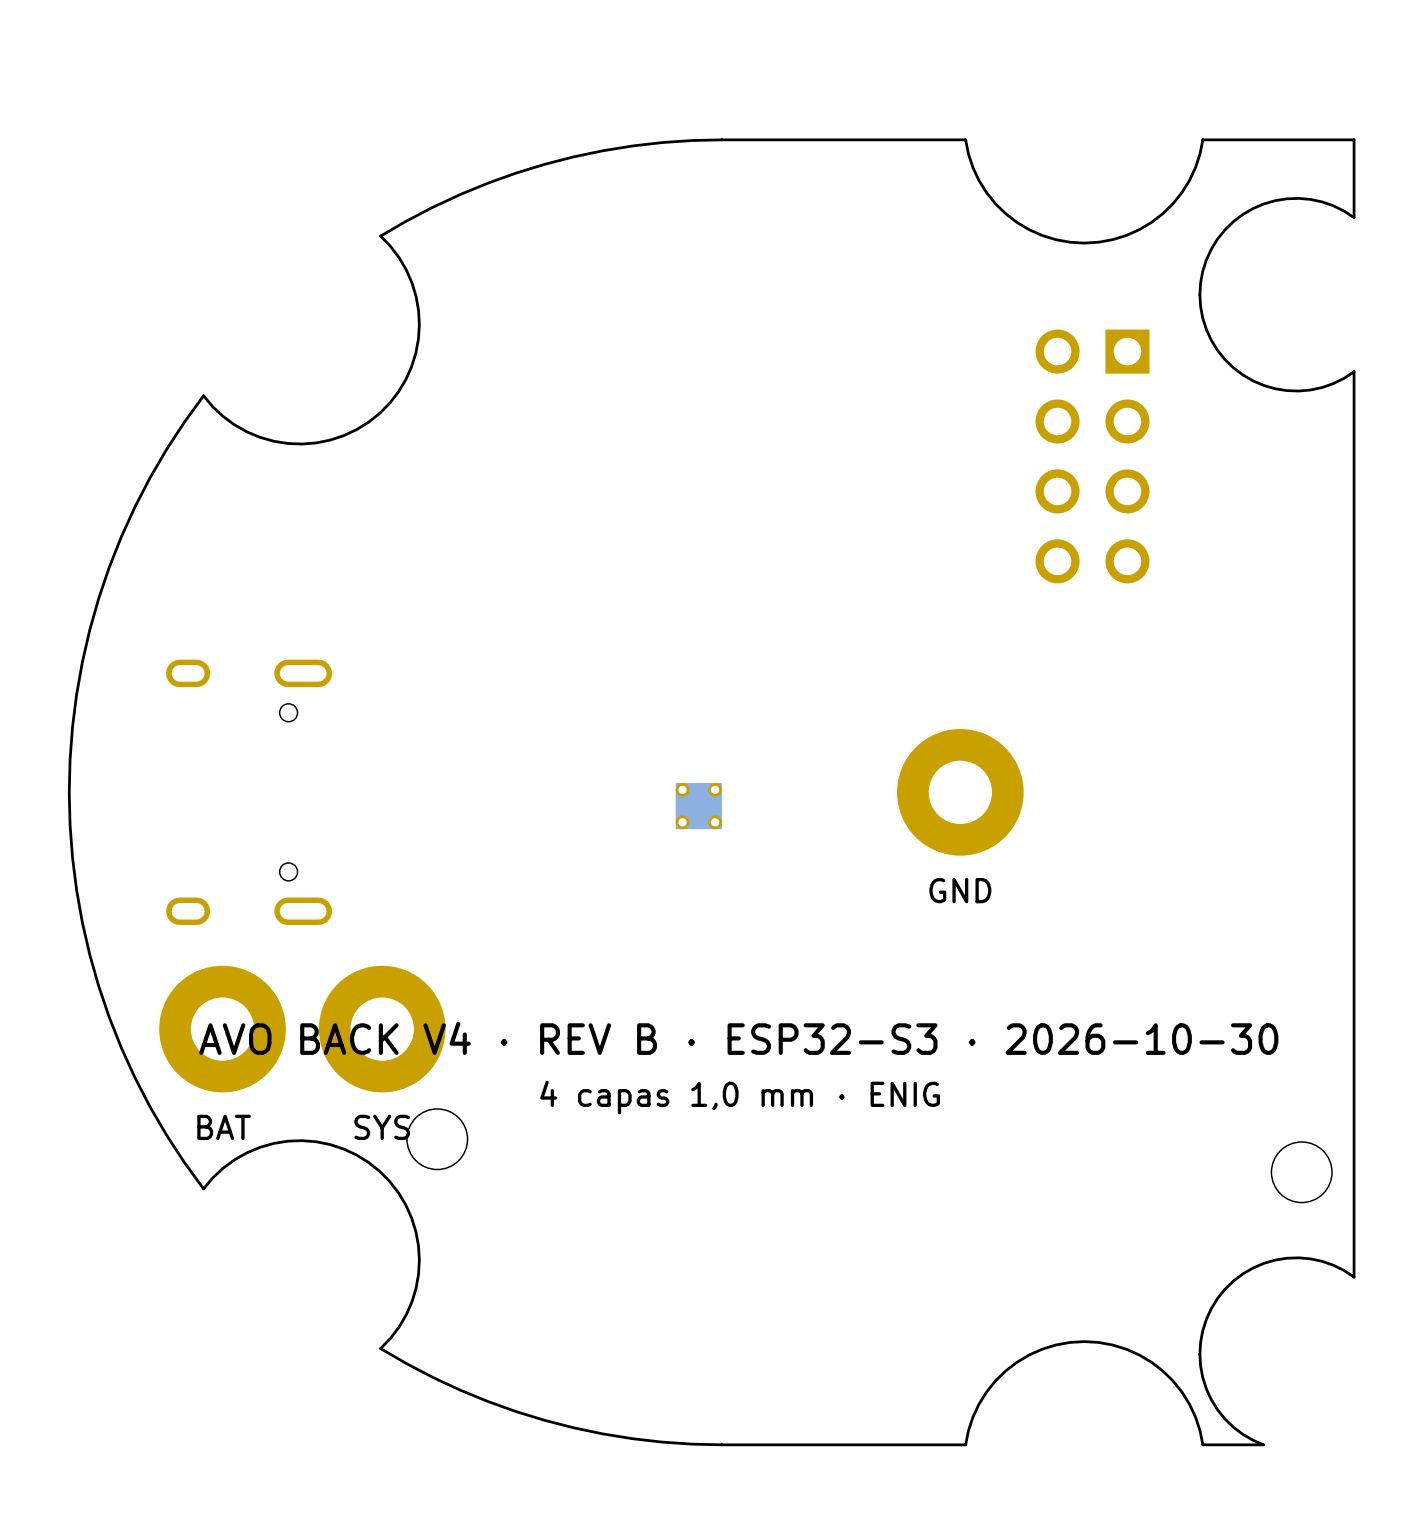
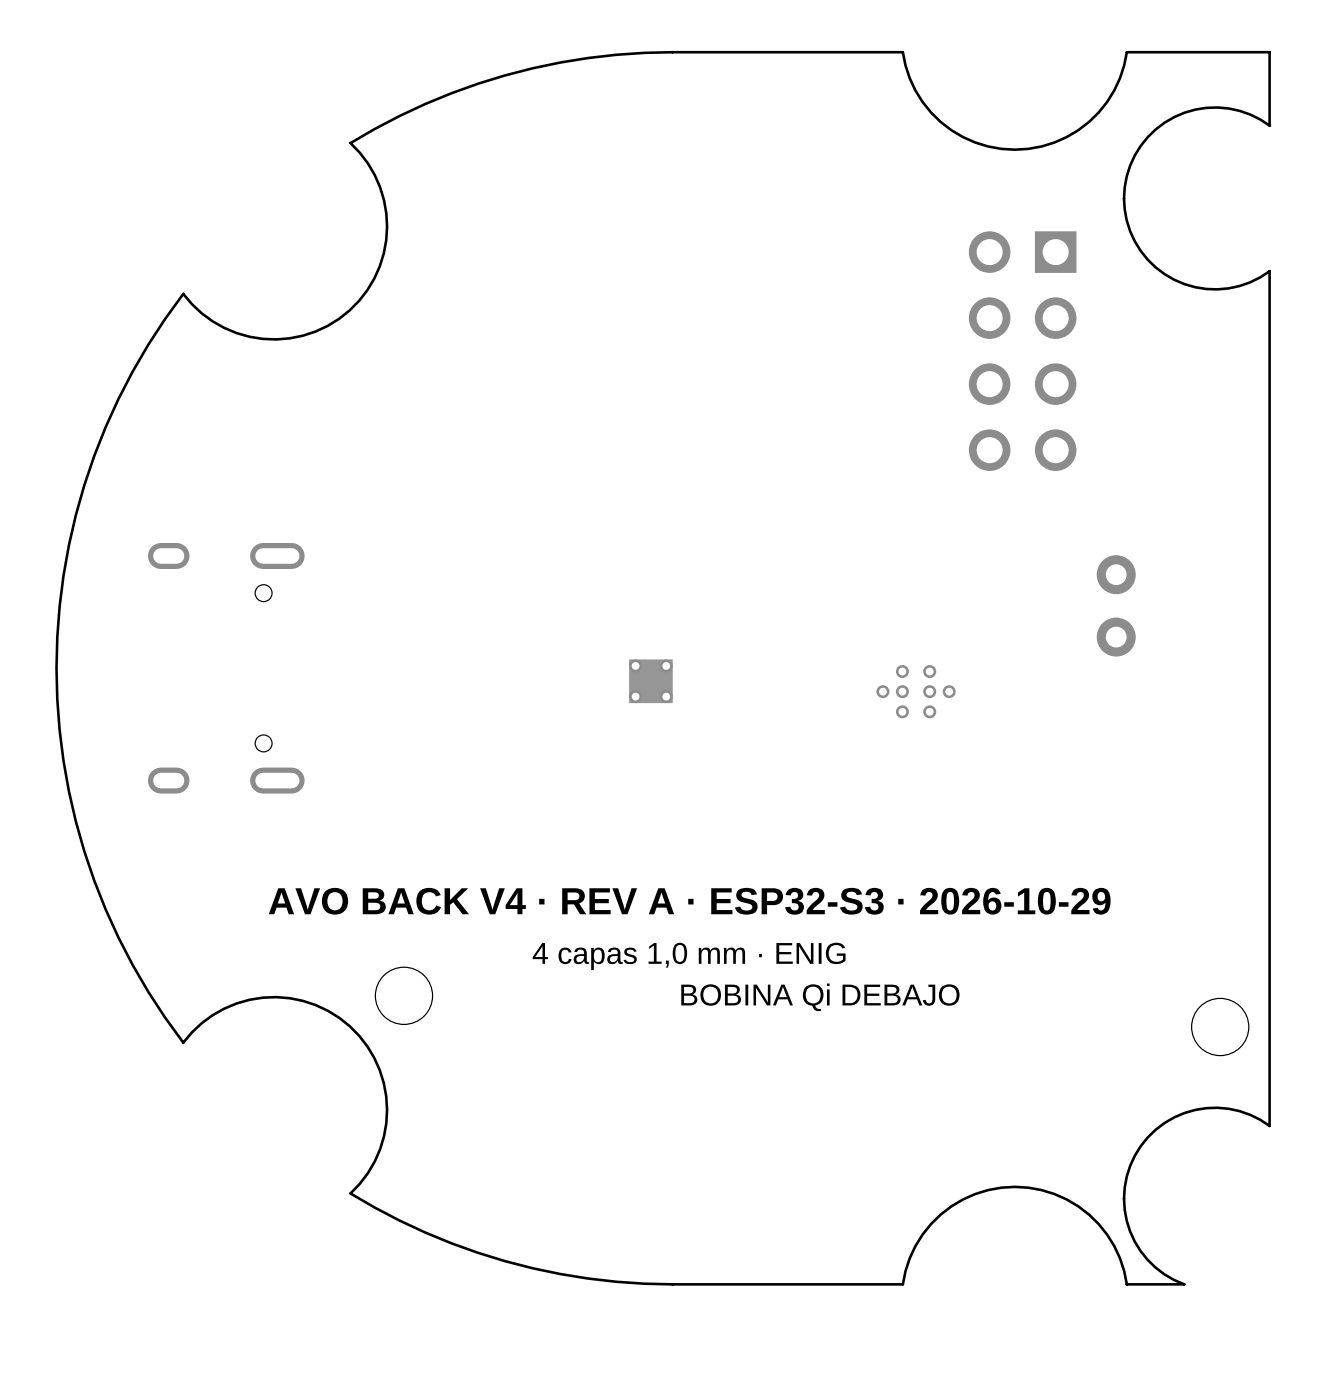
part: none -> (1116, 574)
part: none -> (1116, 637)
part: (960, 792) -> none
part: none -> (916, 691)
text: GND (960, 890) -> none
part: (222, 1029) -> none
part: (382, 1029) -> none
text: AVO BACK V4 · REV B · ESP32-S3 · 2026-10-30 (738, 1038) -> AVO BACK V4 · REV A · ESP32-S3 · 2026-10-29 (689, 901)
text: BAT (224, 1127) -> none
text: SYS (382, 1127) -> none
text: none -> BOBINA Qi DEBAJO (820, 997)

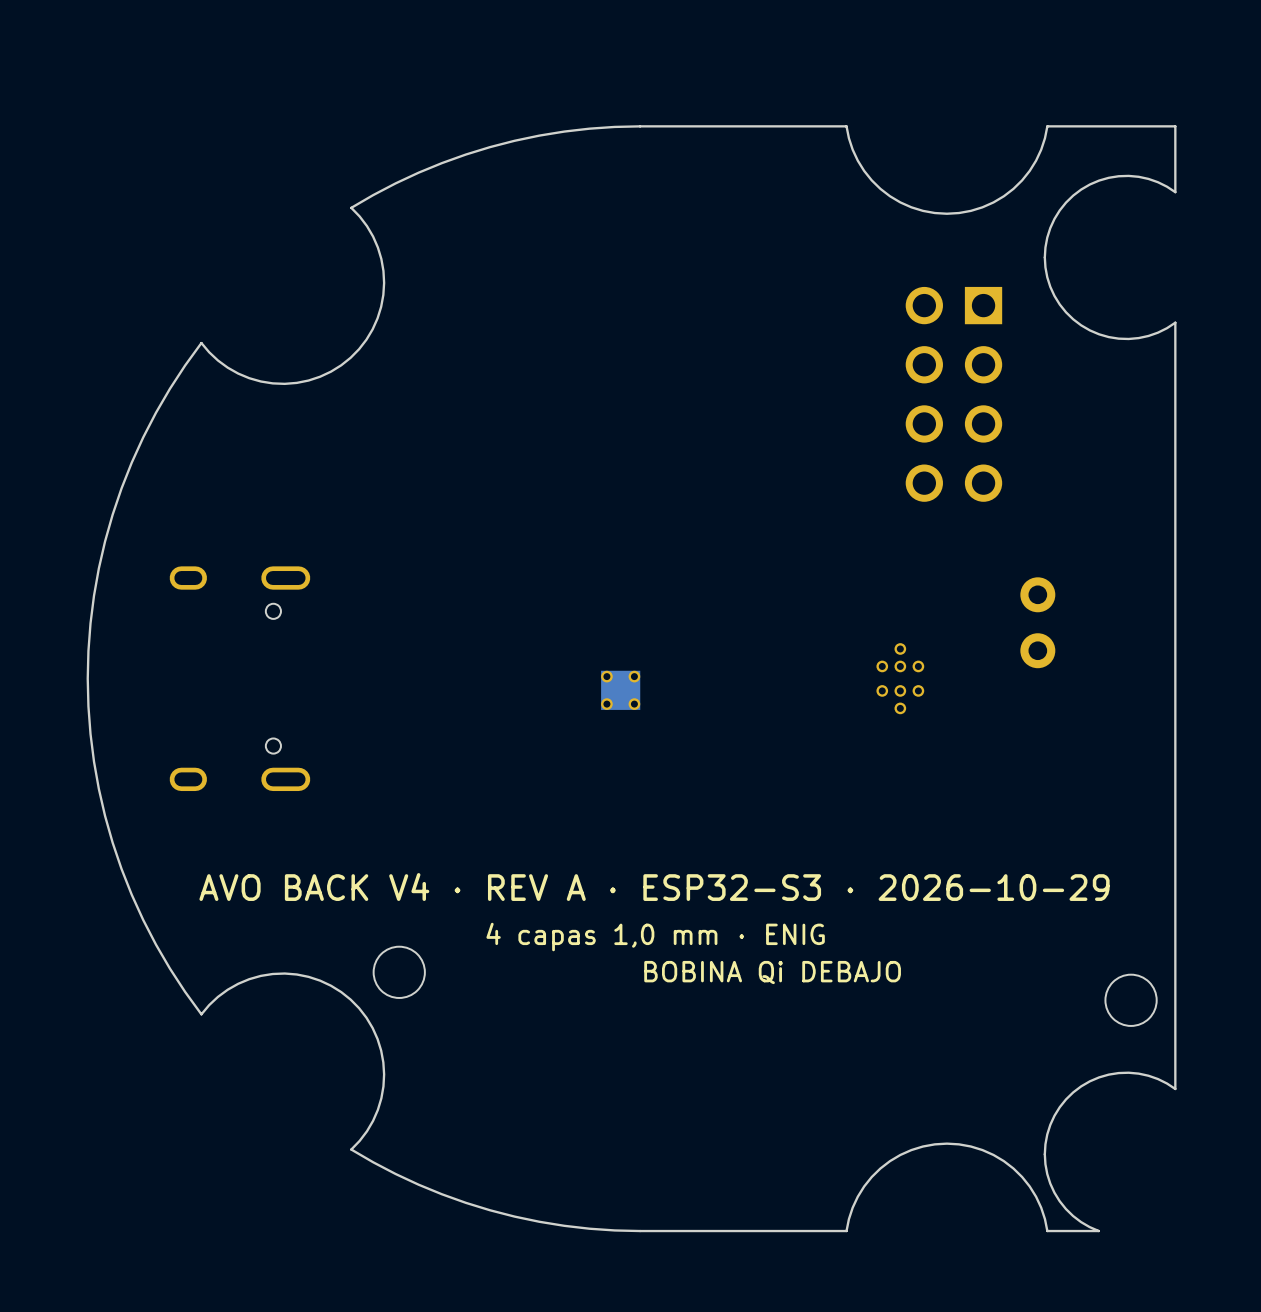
part rotation: 0° (916, 691) -> 90° clockwise (900, 678)
part position: (916, 691) -> (900, 678)

